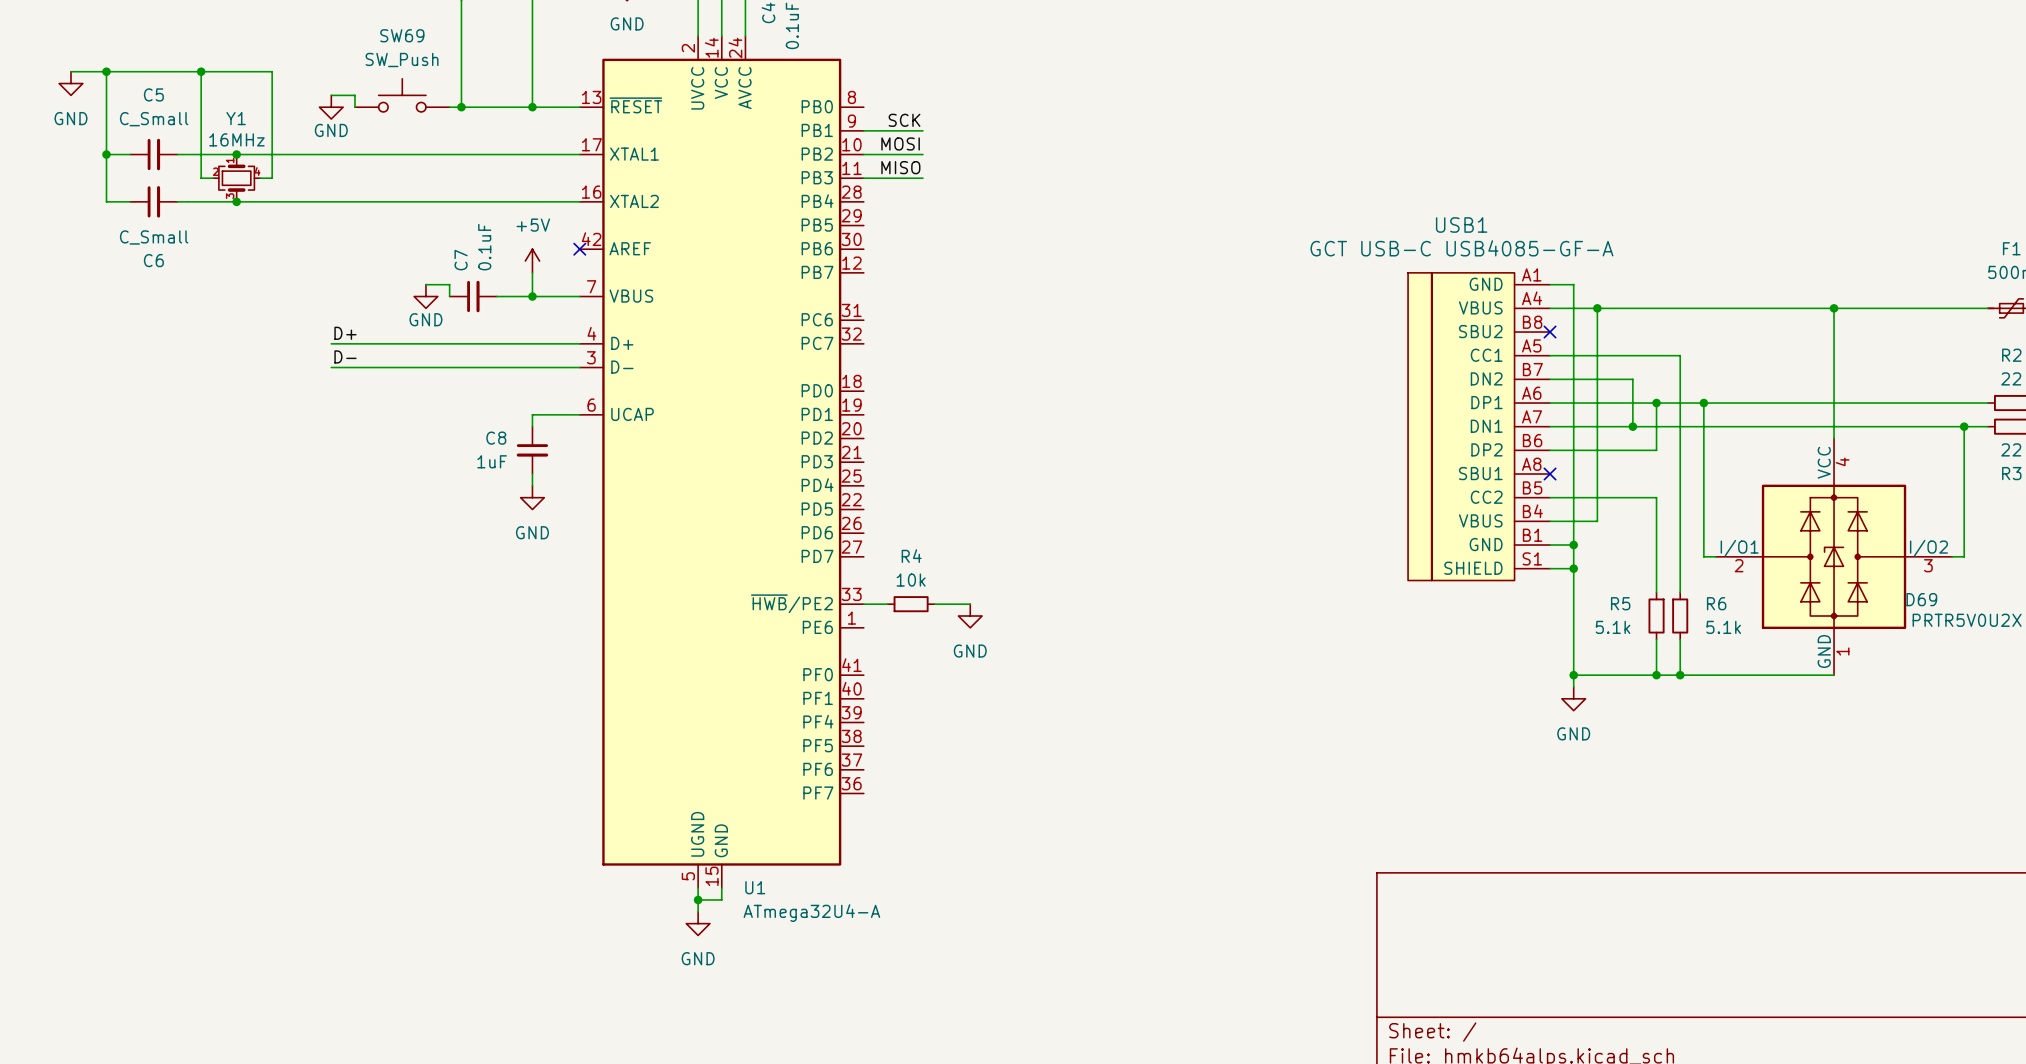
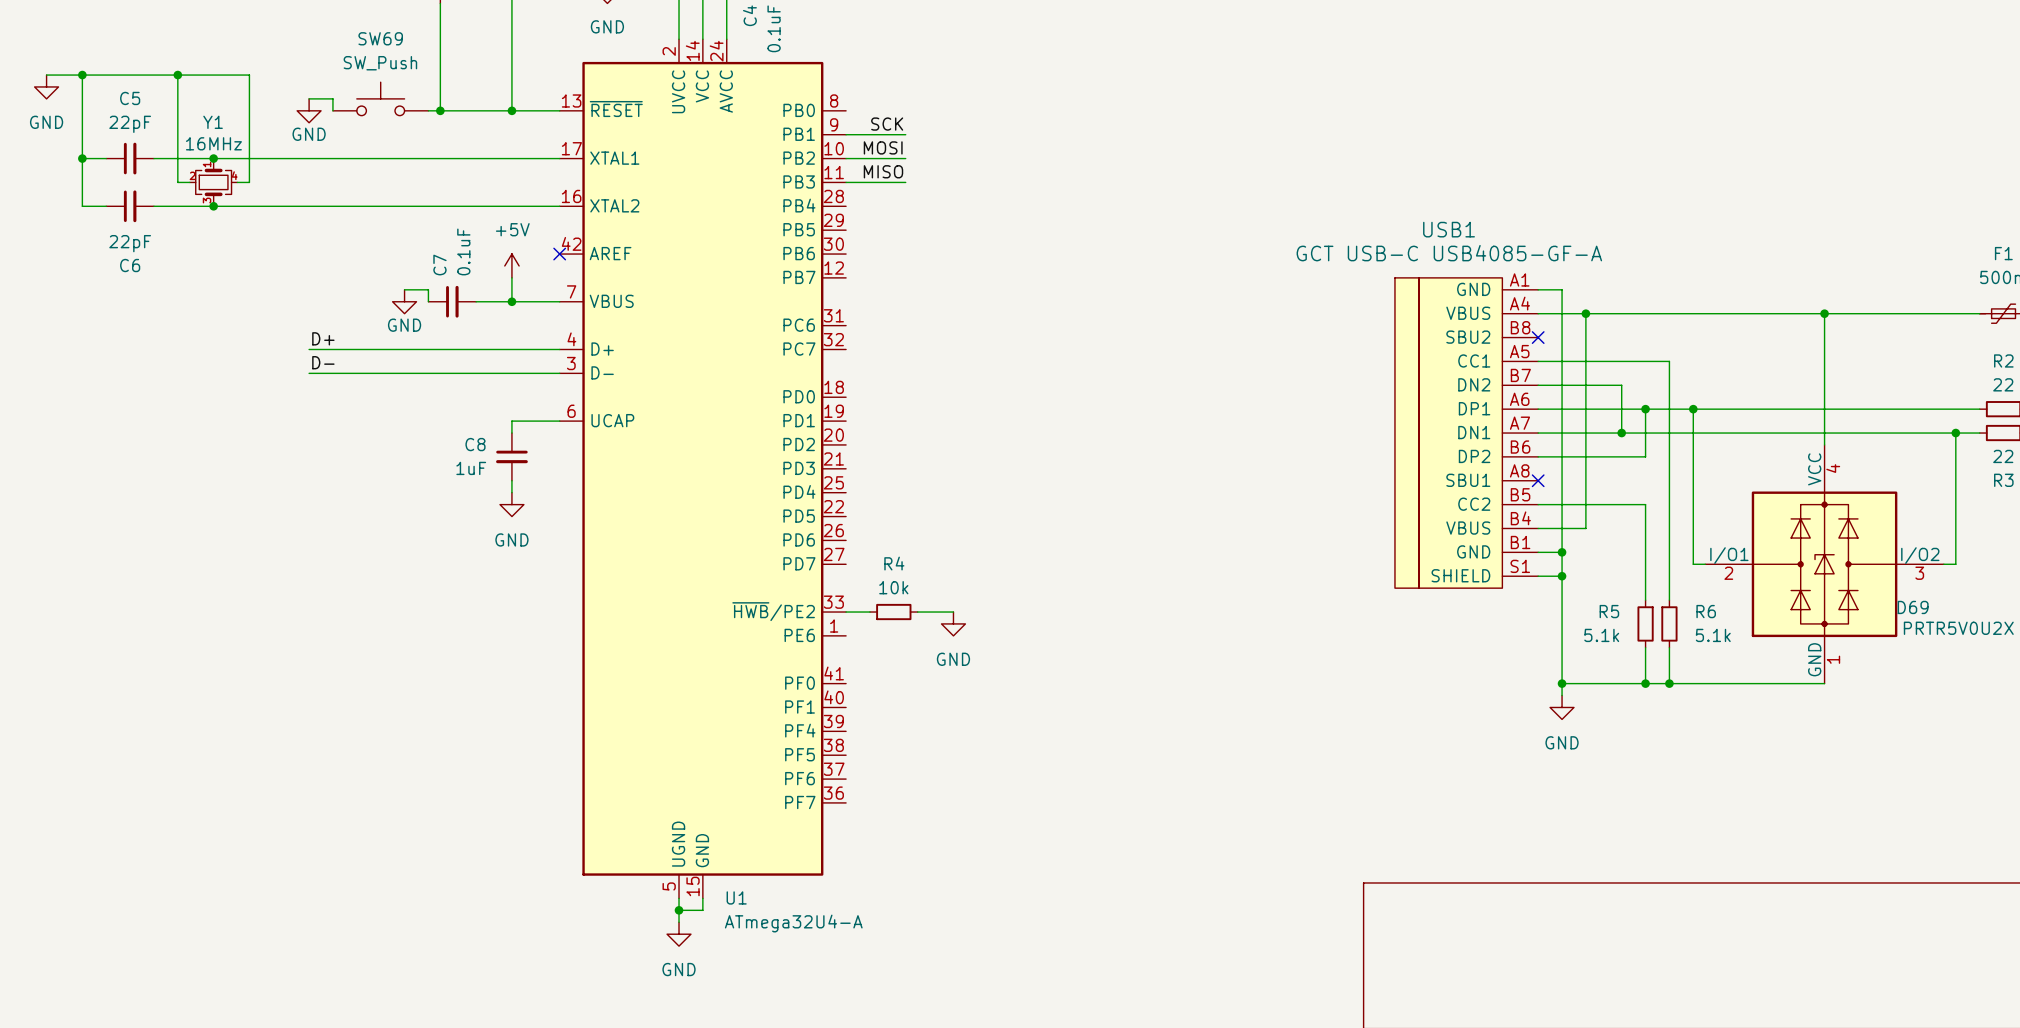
C5 value: C_Small (154, 119) -> 22pF (130, 124)
C6 value: C_Small (154, 237) -> 22pF (130, 243)

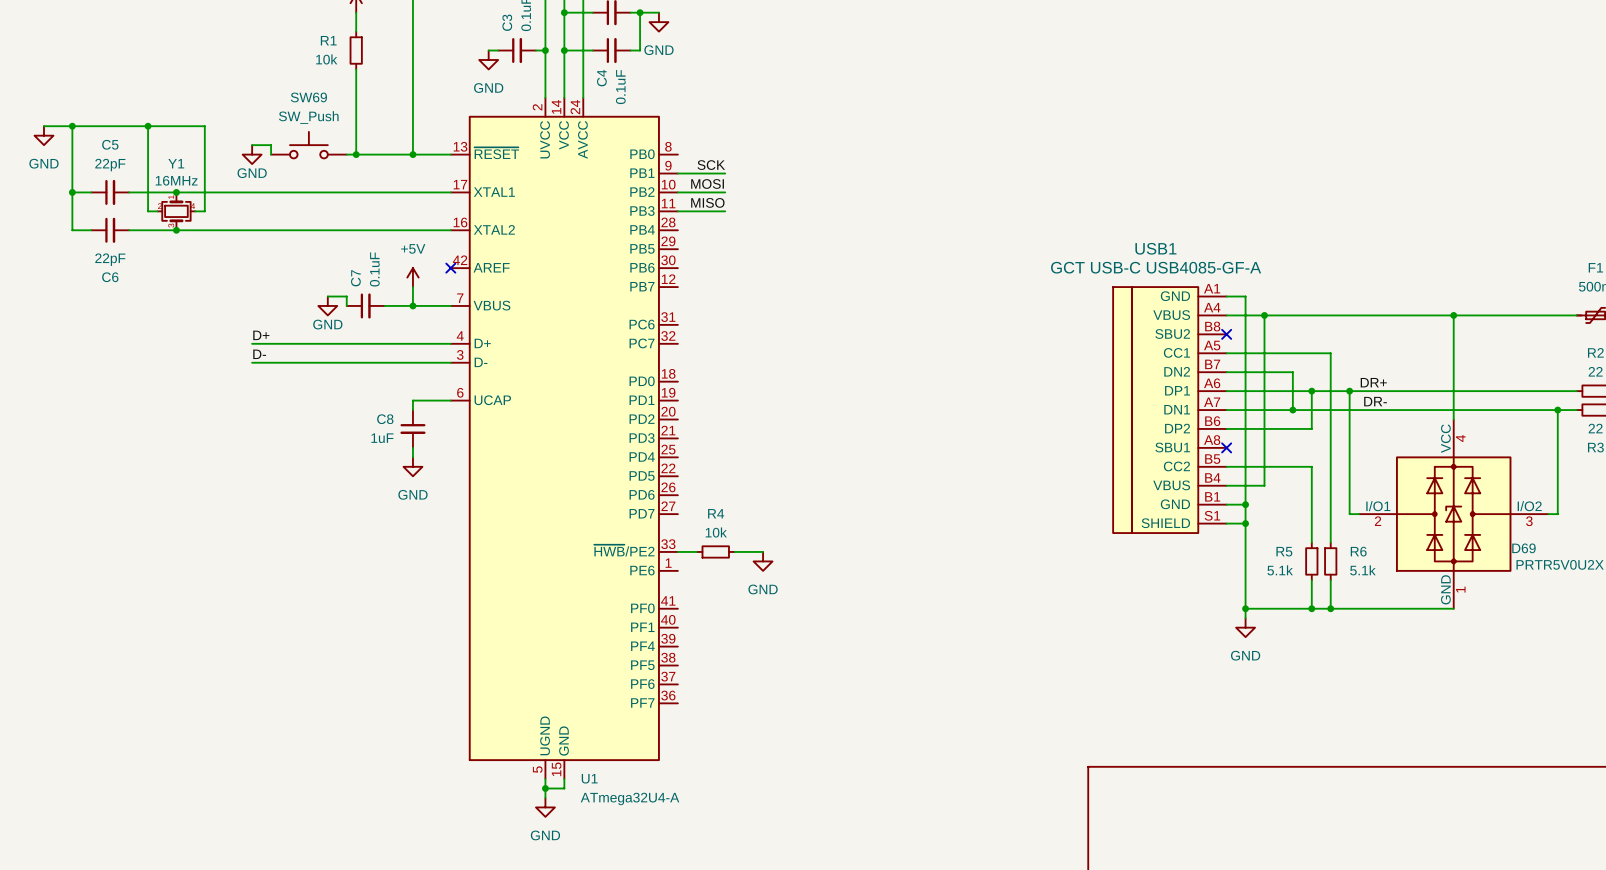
label: none -> DR+ (1373, 382)
label: none -> DR- (1375, 401)

